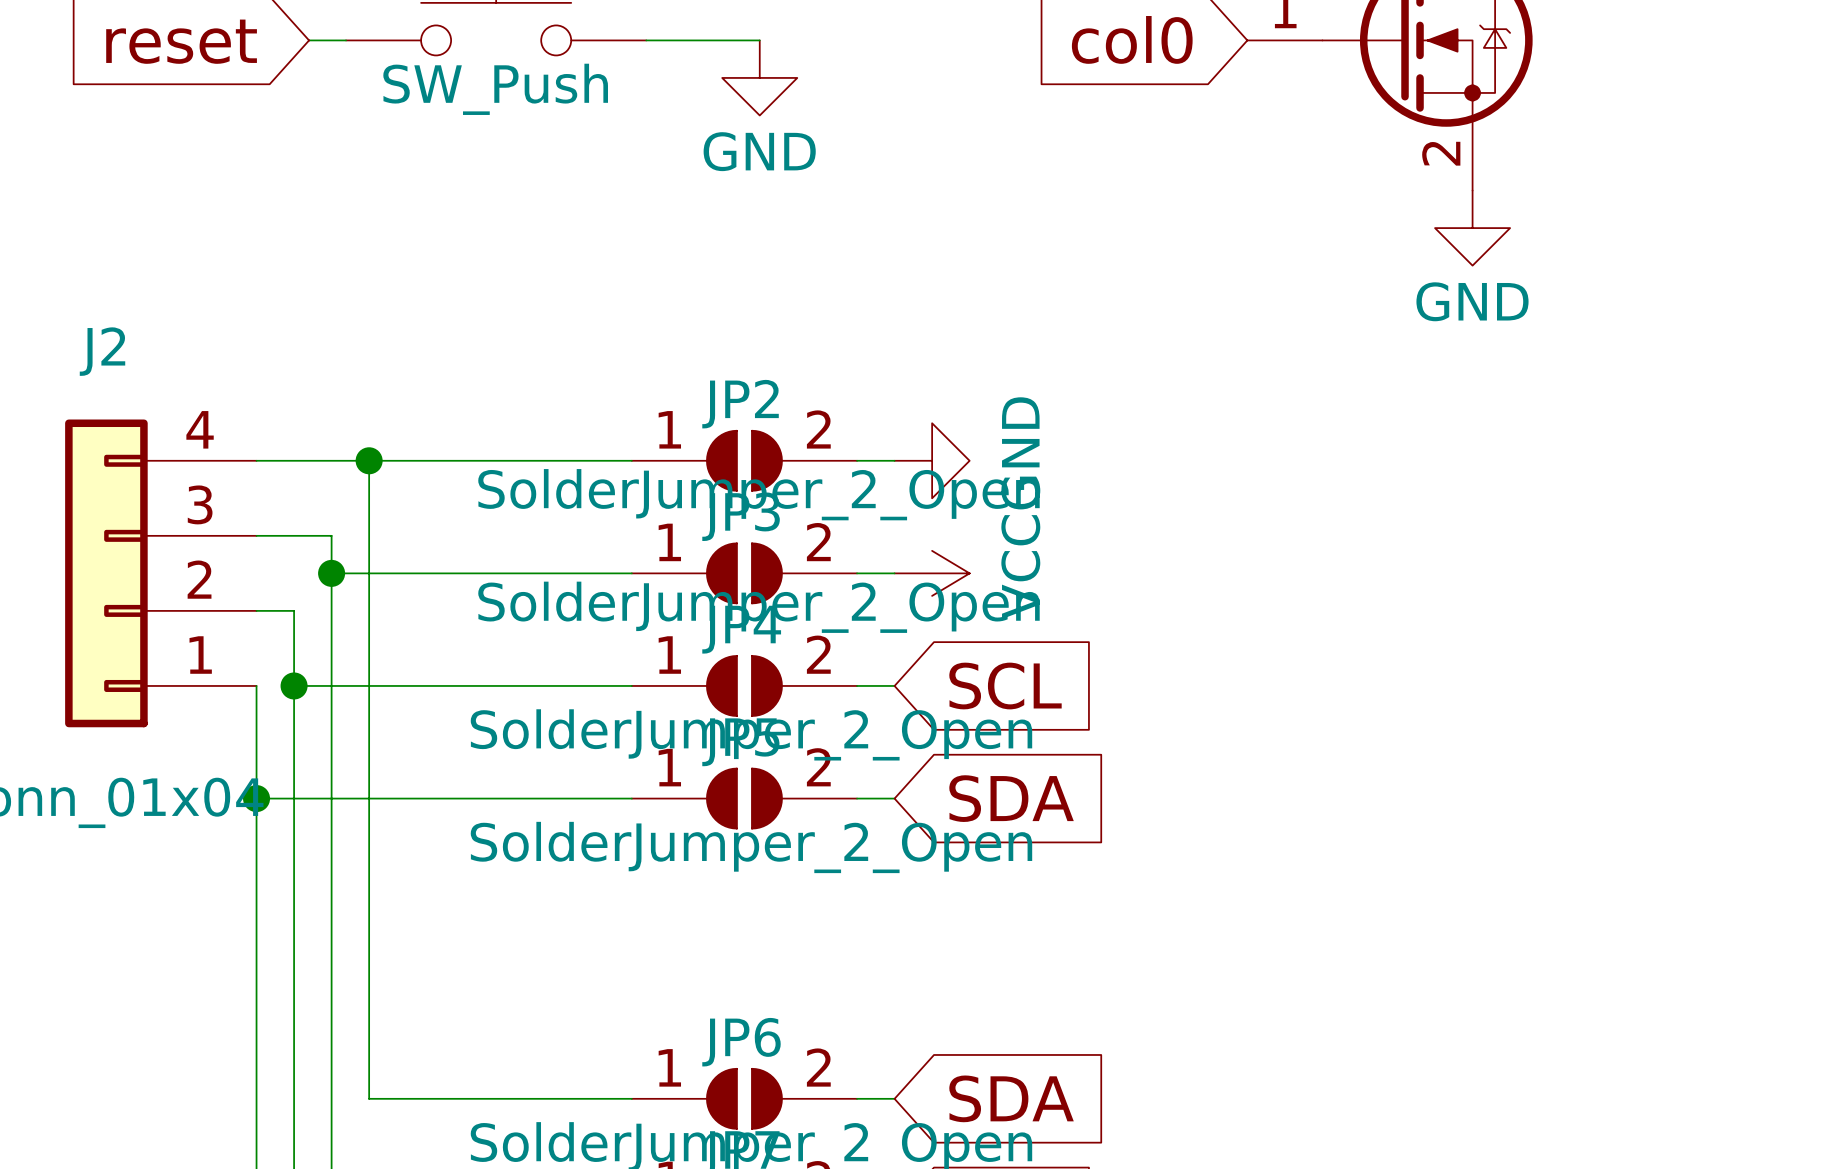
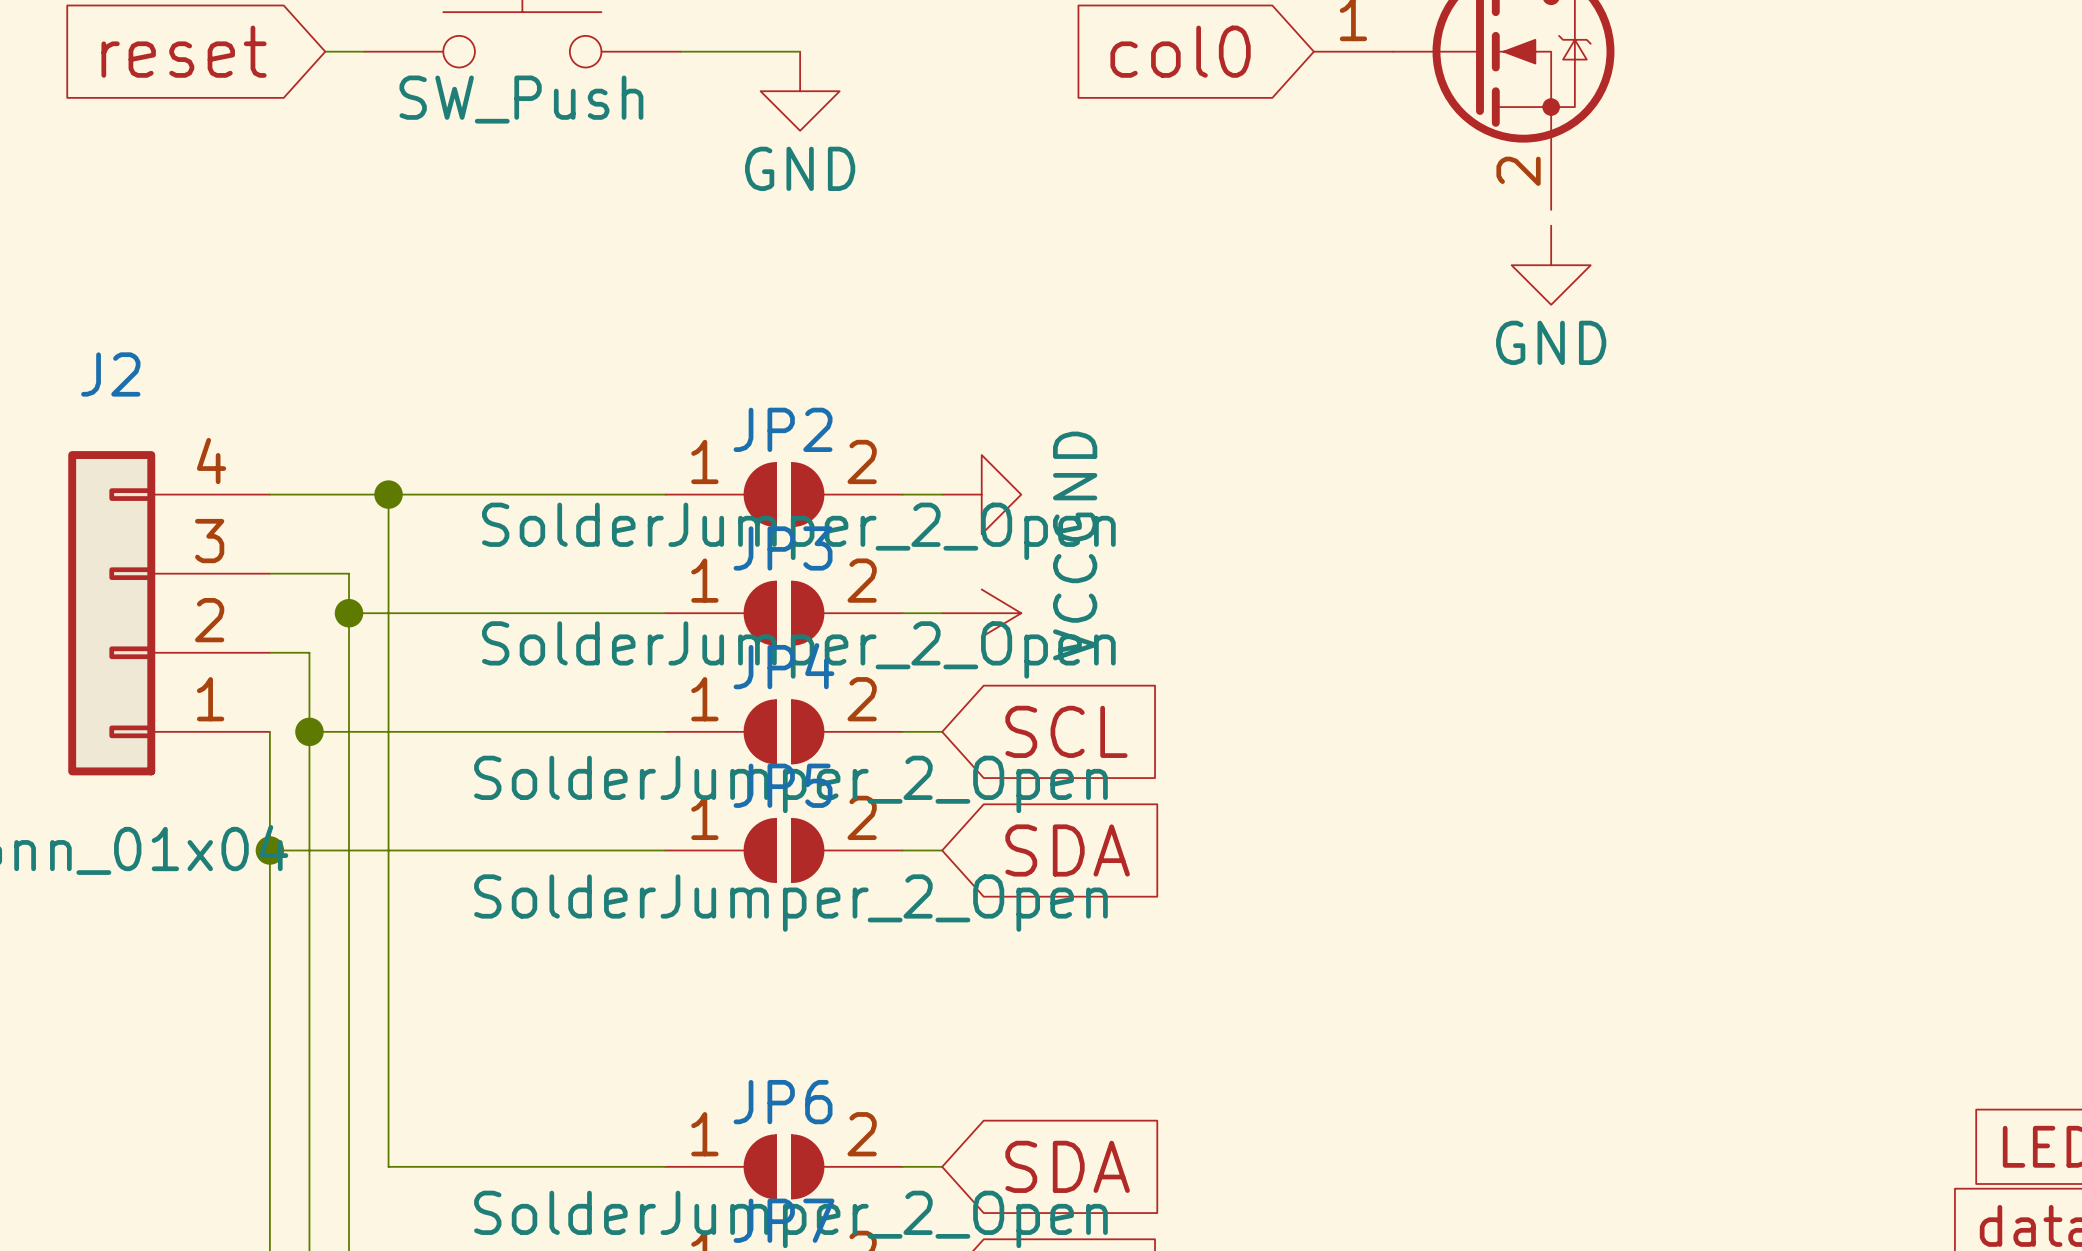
power symbol position: GND (1472, 228) -> GND (1551, 265)

